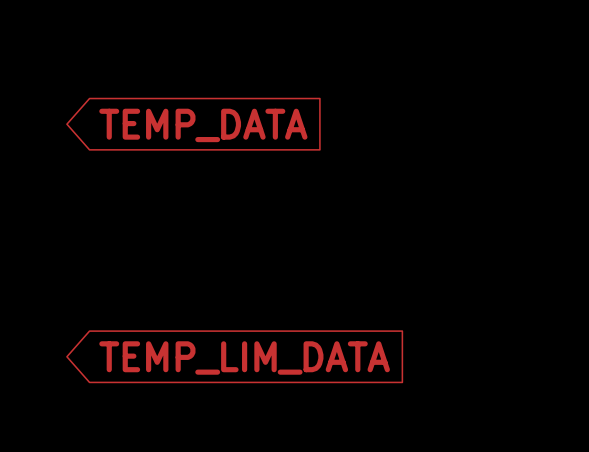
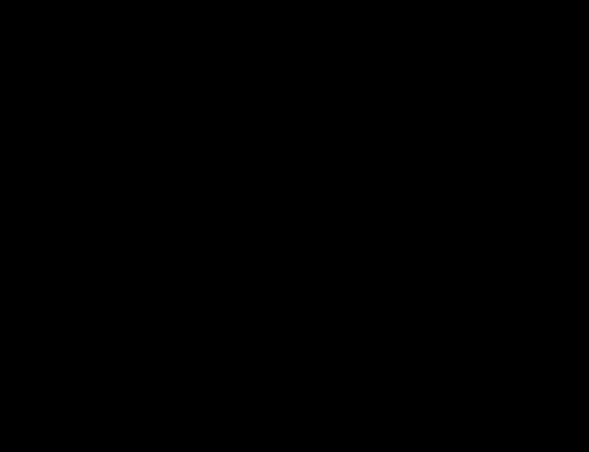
global label: TEMP_DATA (203, 125) -> none
global label: TEMP_LIM_DATA (244, 357) -> none

